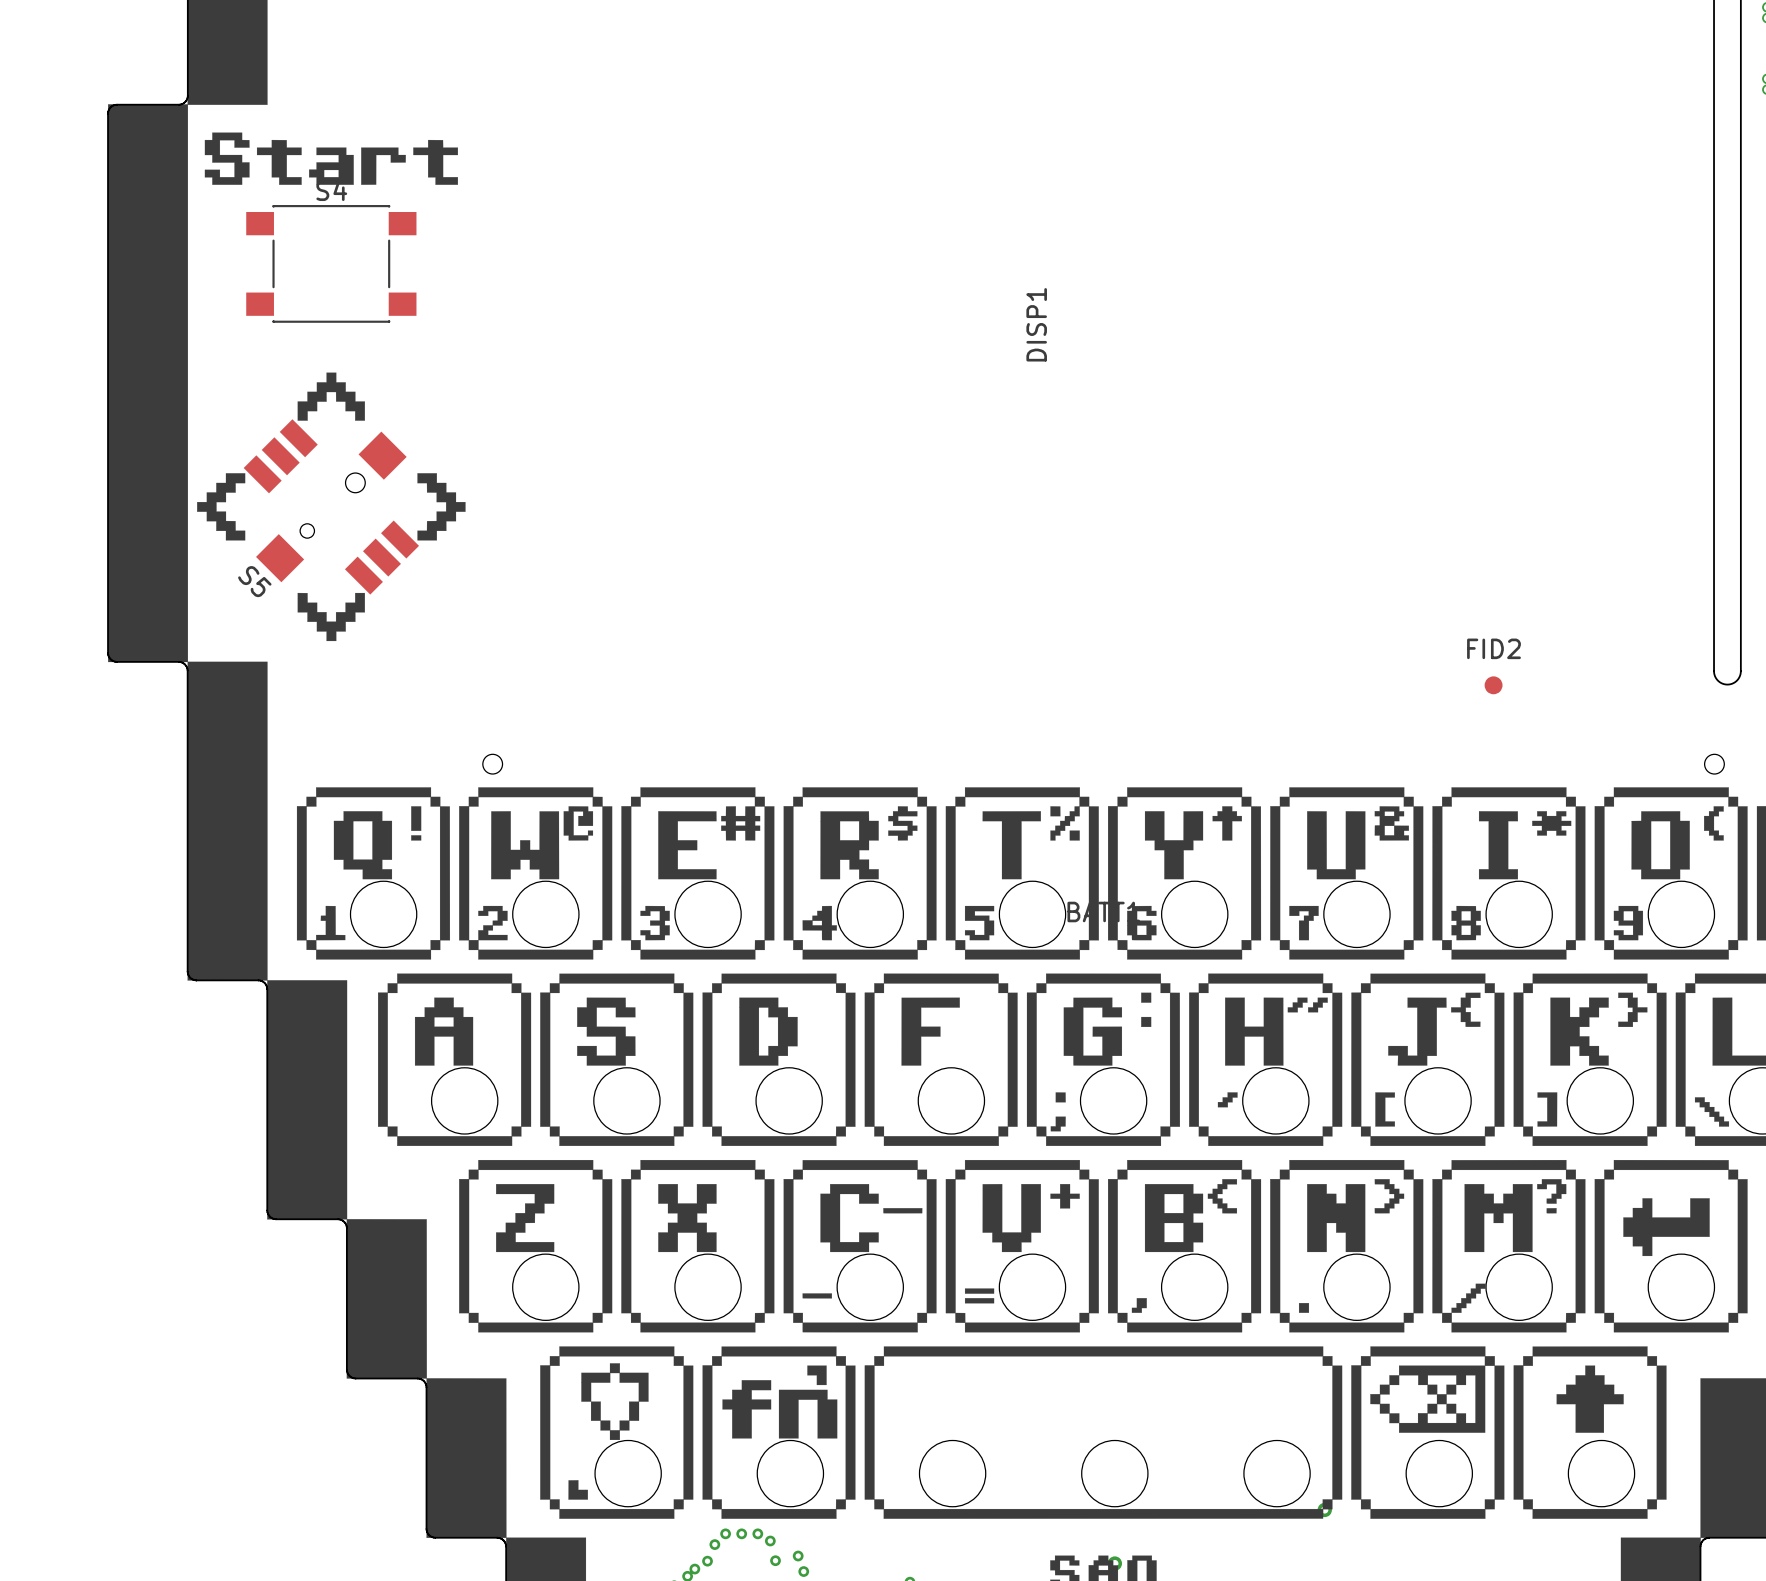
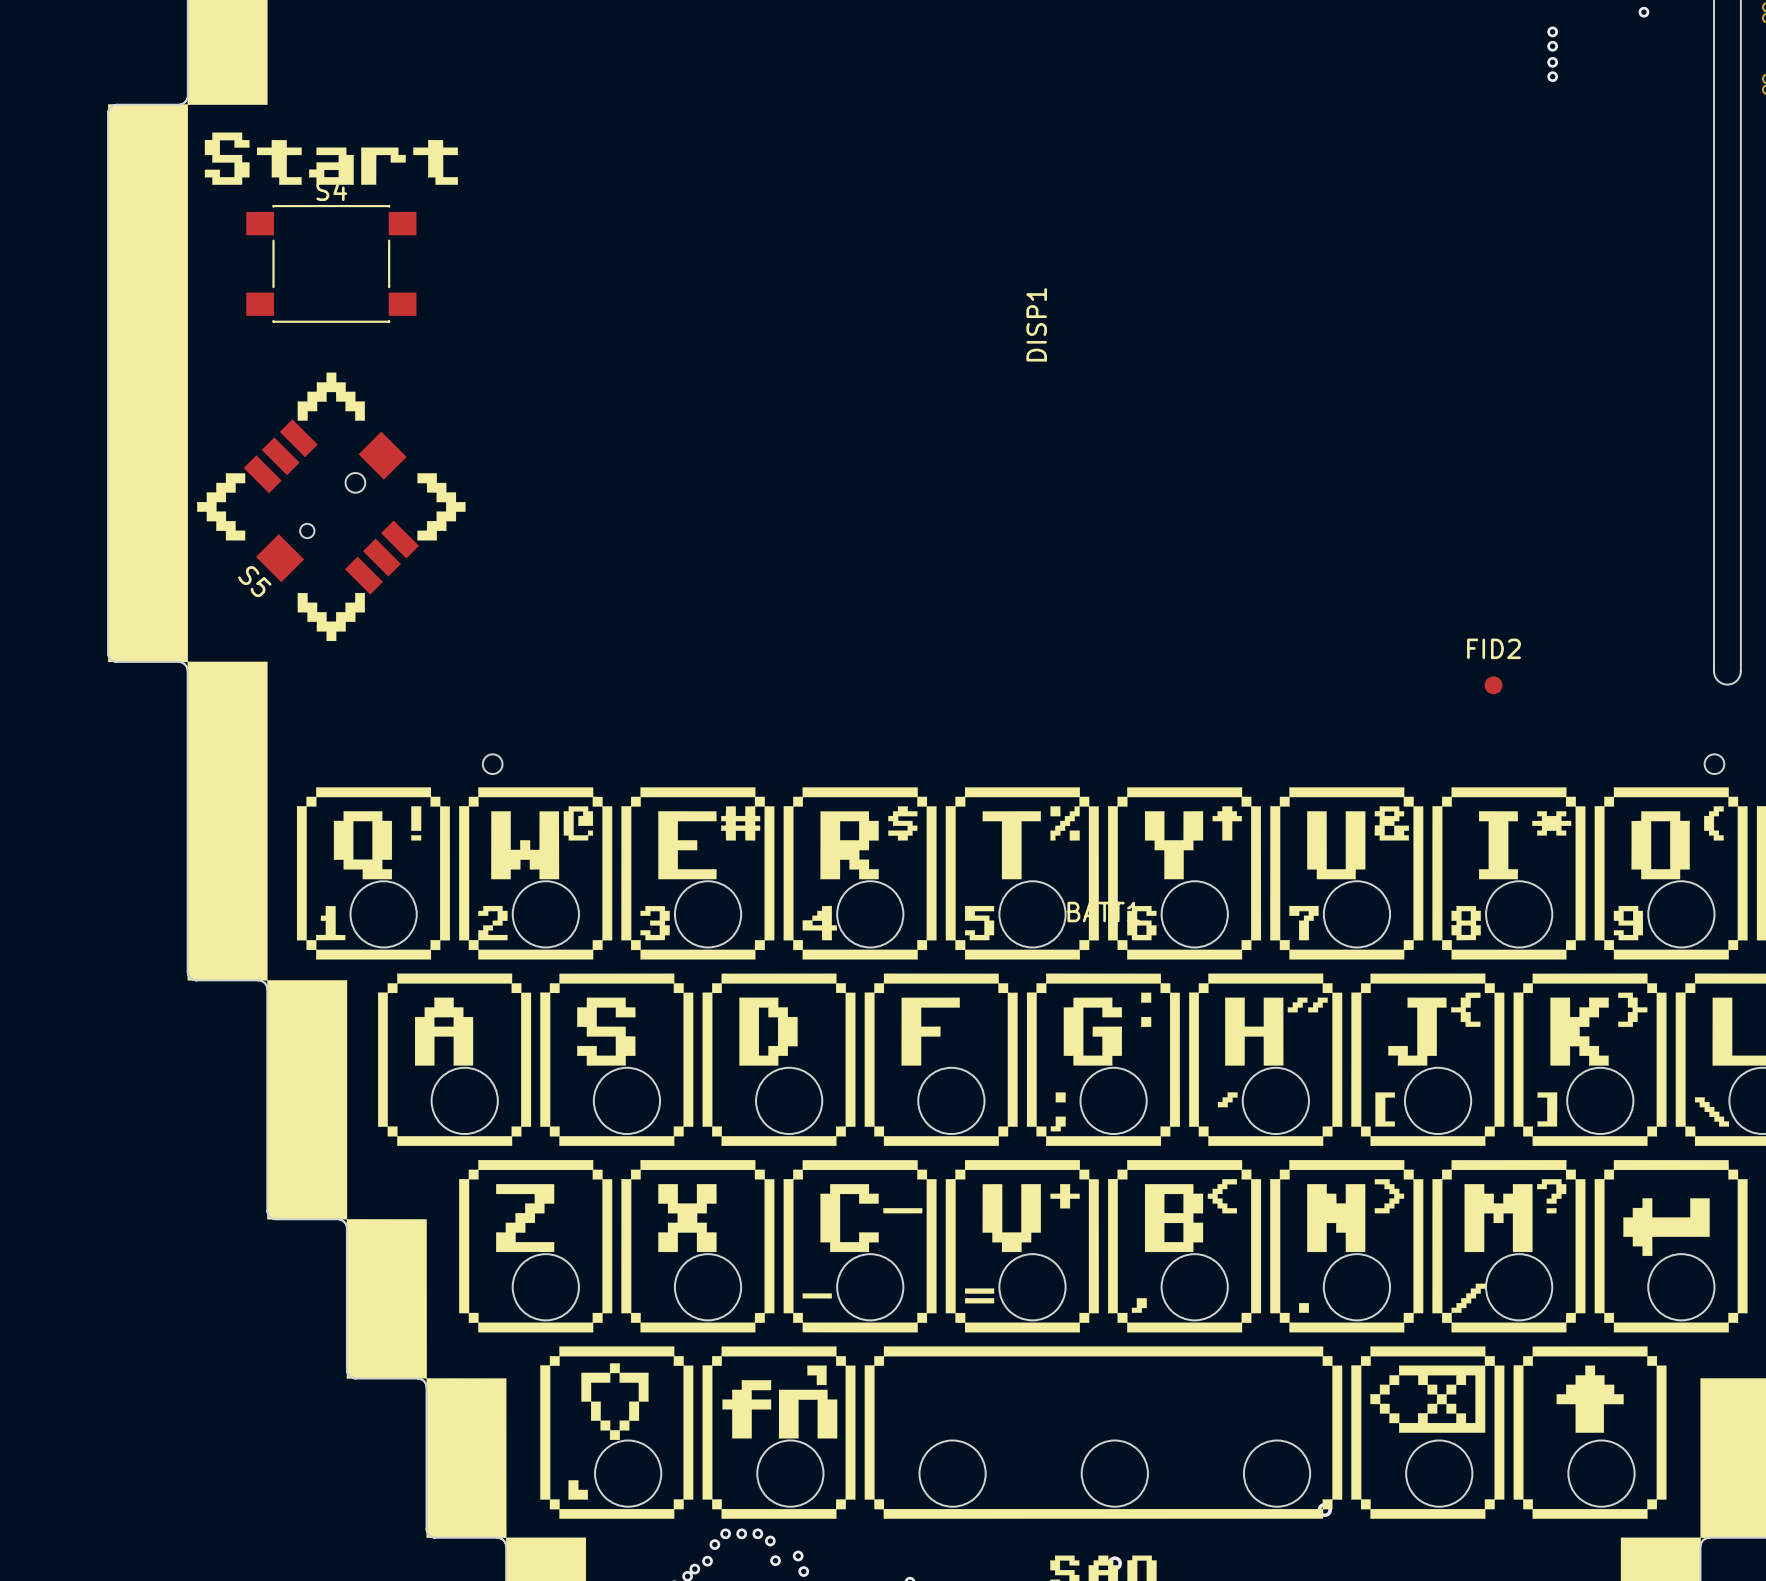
via: none -> (1643, 12)
via: none -> (1552, 31)
via: none -> (1552, 46)
via: none -> (1552, 62)
via: none -> (1552, 76)

